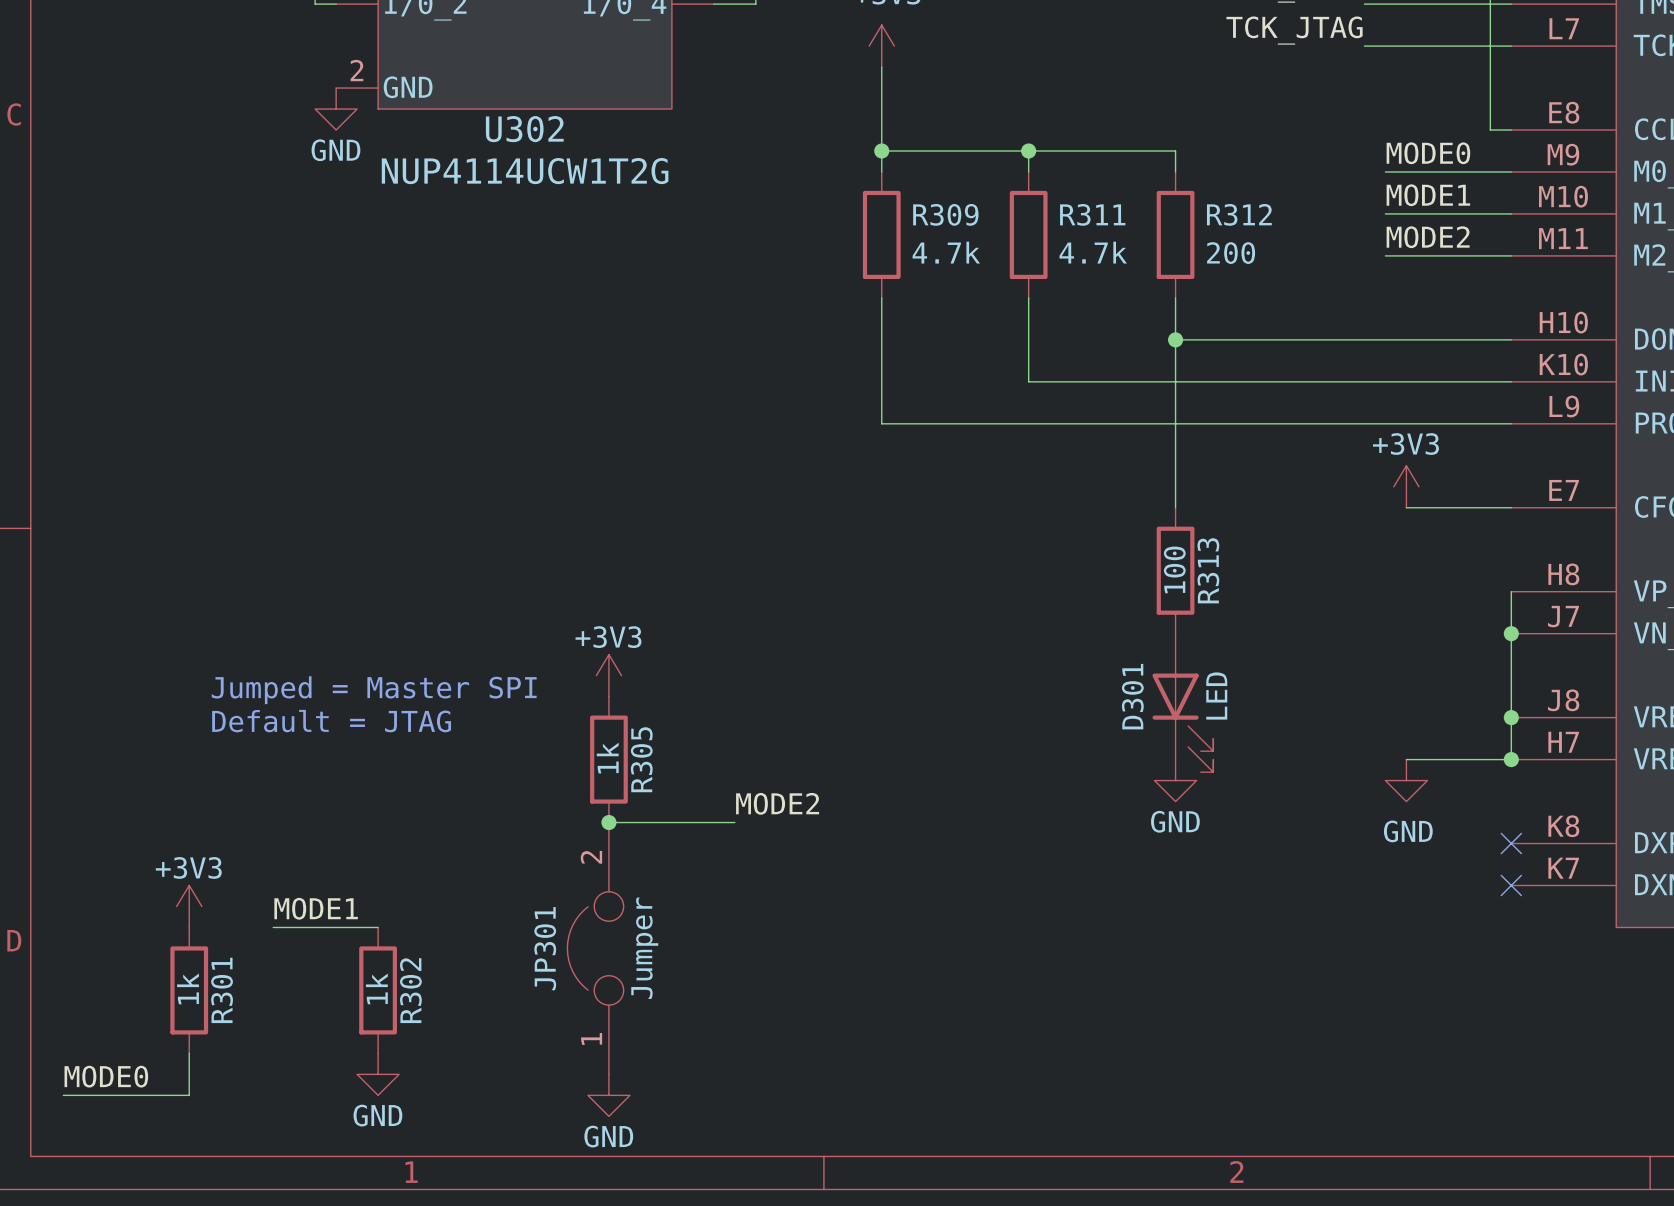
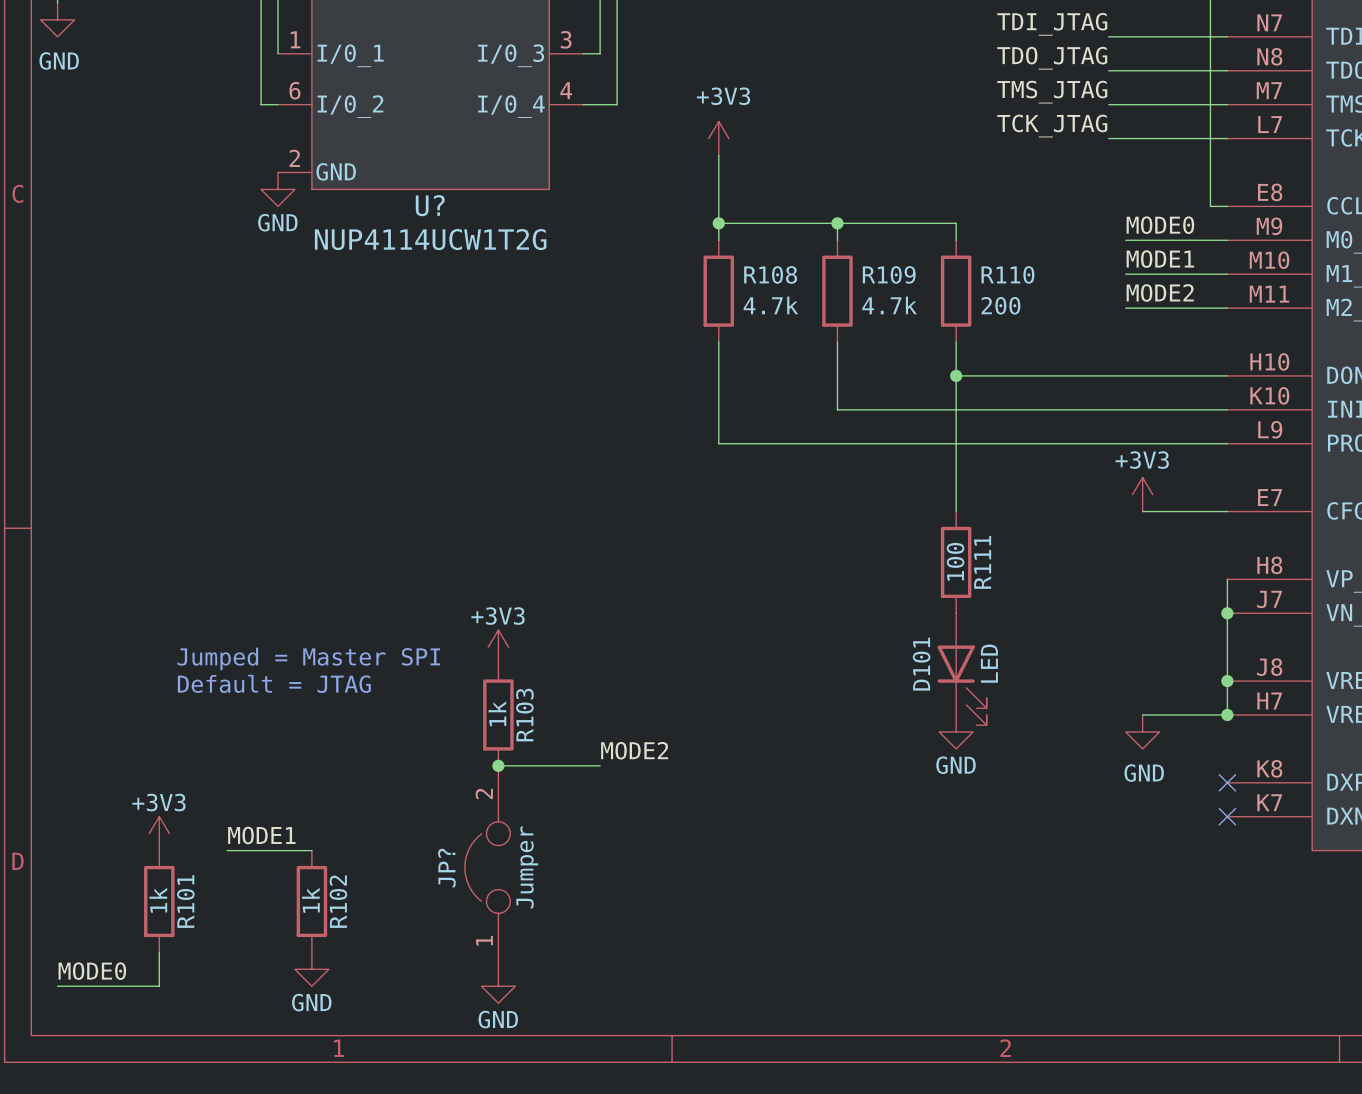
U302 name: U302 (524, 129) -> U? (430, 205)
R309 name: R309 (945, 214) -> R108 (770, 274)
R311 name: R311 (1092, 214) -> R109 (889, 274)
R312 name: R312 (1239, 214) -> R110 (1007, 274)
R313 name: R313 (1208, 570) -> R111 (982, 562)
D301 name: D301 (1132, 696) -> D101 (921, 664)
R305 name: R305 (641, 759) -> R103 (524, 715)
JP301 name: JP301 (545, 948) -> JP? (446, 868)
R301 name: R301 (222, 990) -> R101 (185, 901)
R302 name: R302 (410, 990) -> R102 (338, 901)

